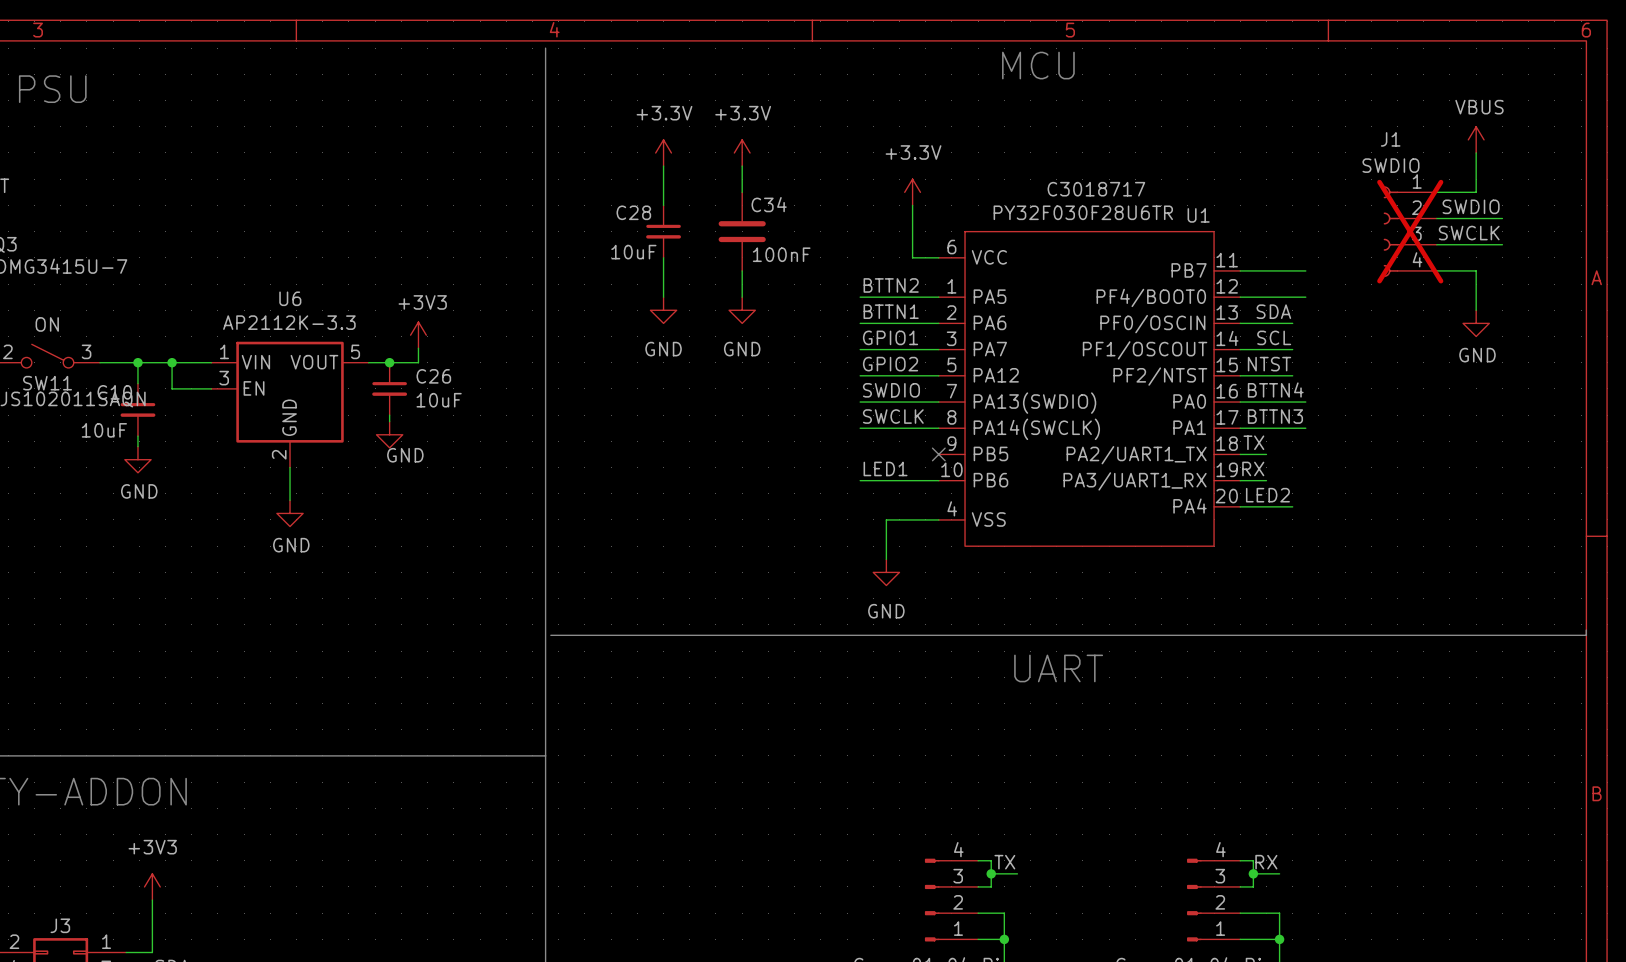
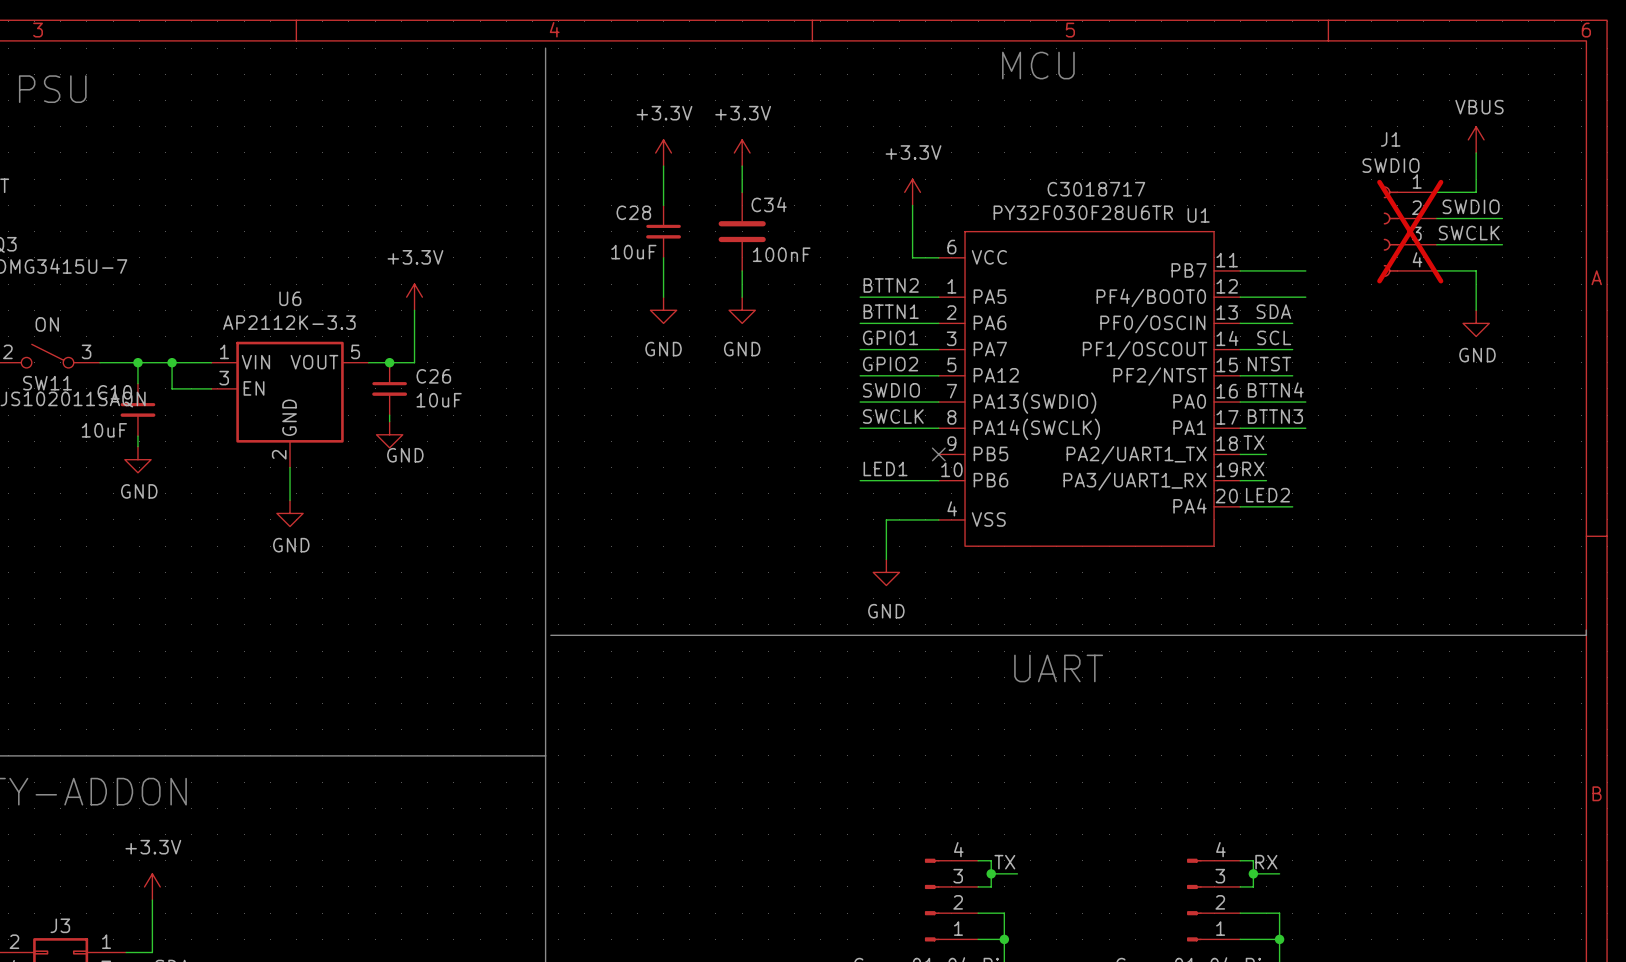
power symbol: none -> +3.3V (414, 297)
power symbol: +3V3 (418, 335) -> none
wire: (418, 348) (418, 362) (414, 362) -> (414, 310) (414, 362)
power symbol: +3V3 (152, 886) -> +3.3V (152, 886)

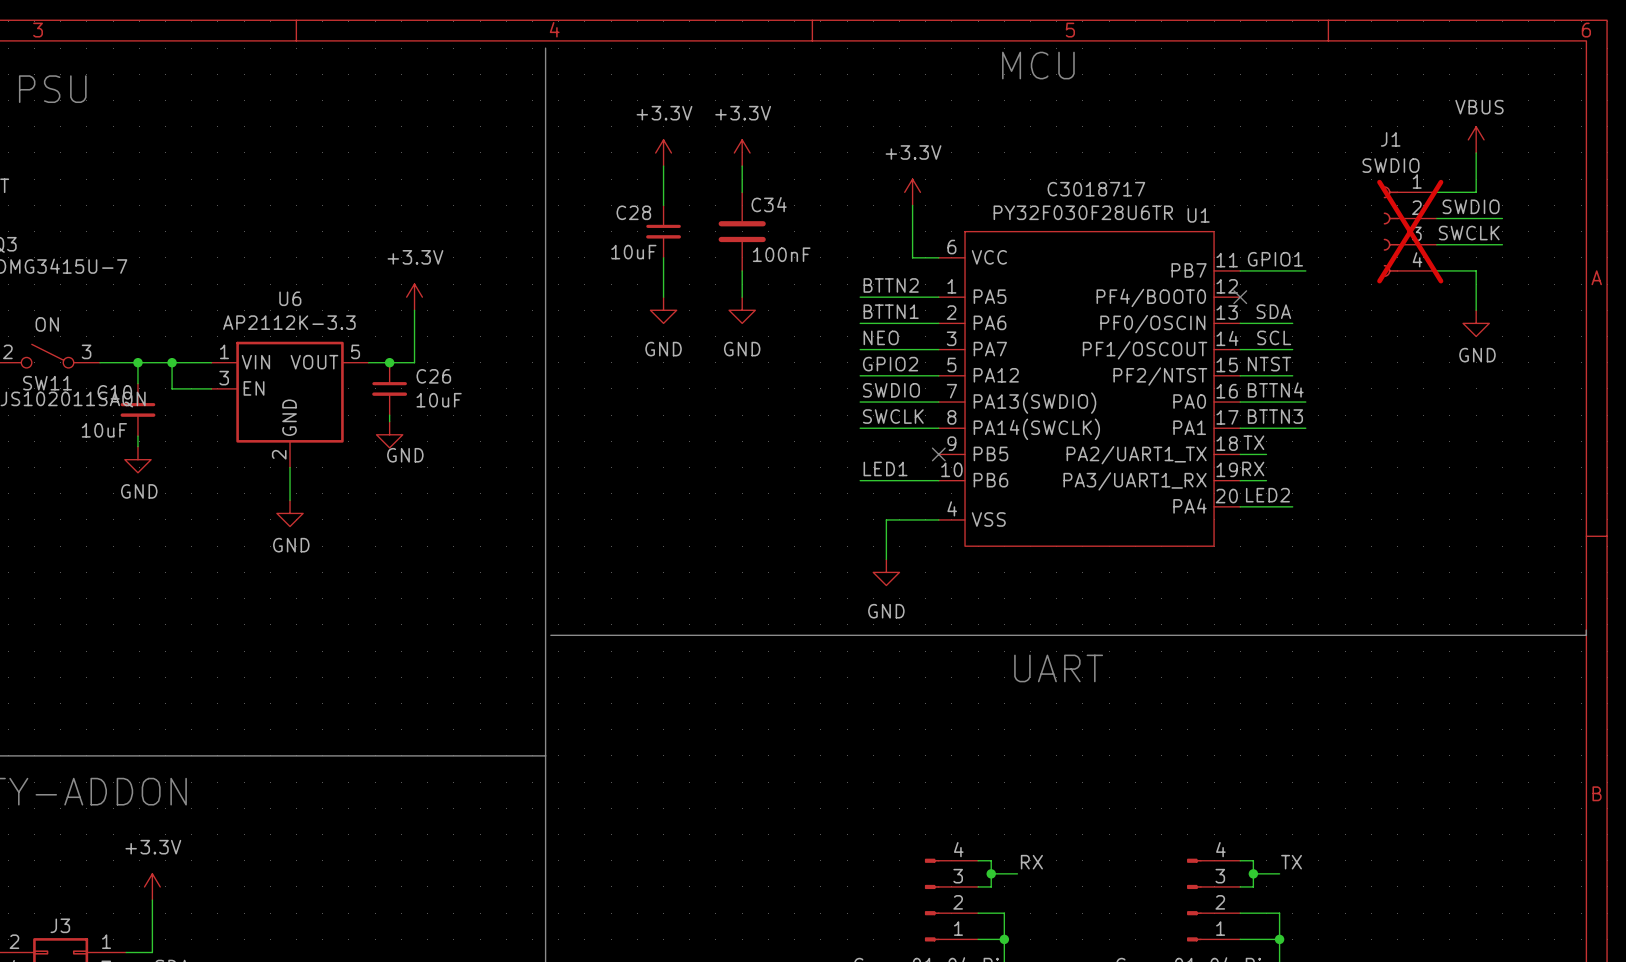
label: none -> GPIO1 (1275, 259)
wire: (1240, 297) (1305, 297) -> none
no-connect mark: none -> (1240, 297)
label: GPIO1 (890, 337) -> NEO (881, 337)
label: TX (1004, 862) -> RX (1031, 862)
label: RX (1266, 862) -> TX (1291, 862)

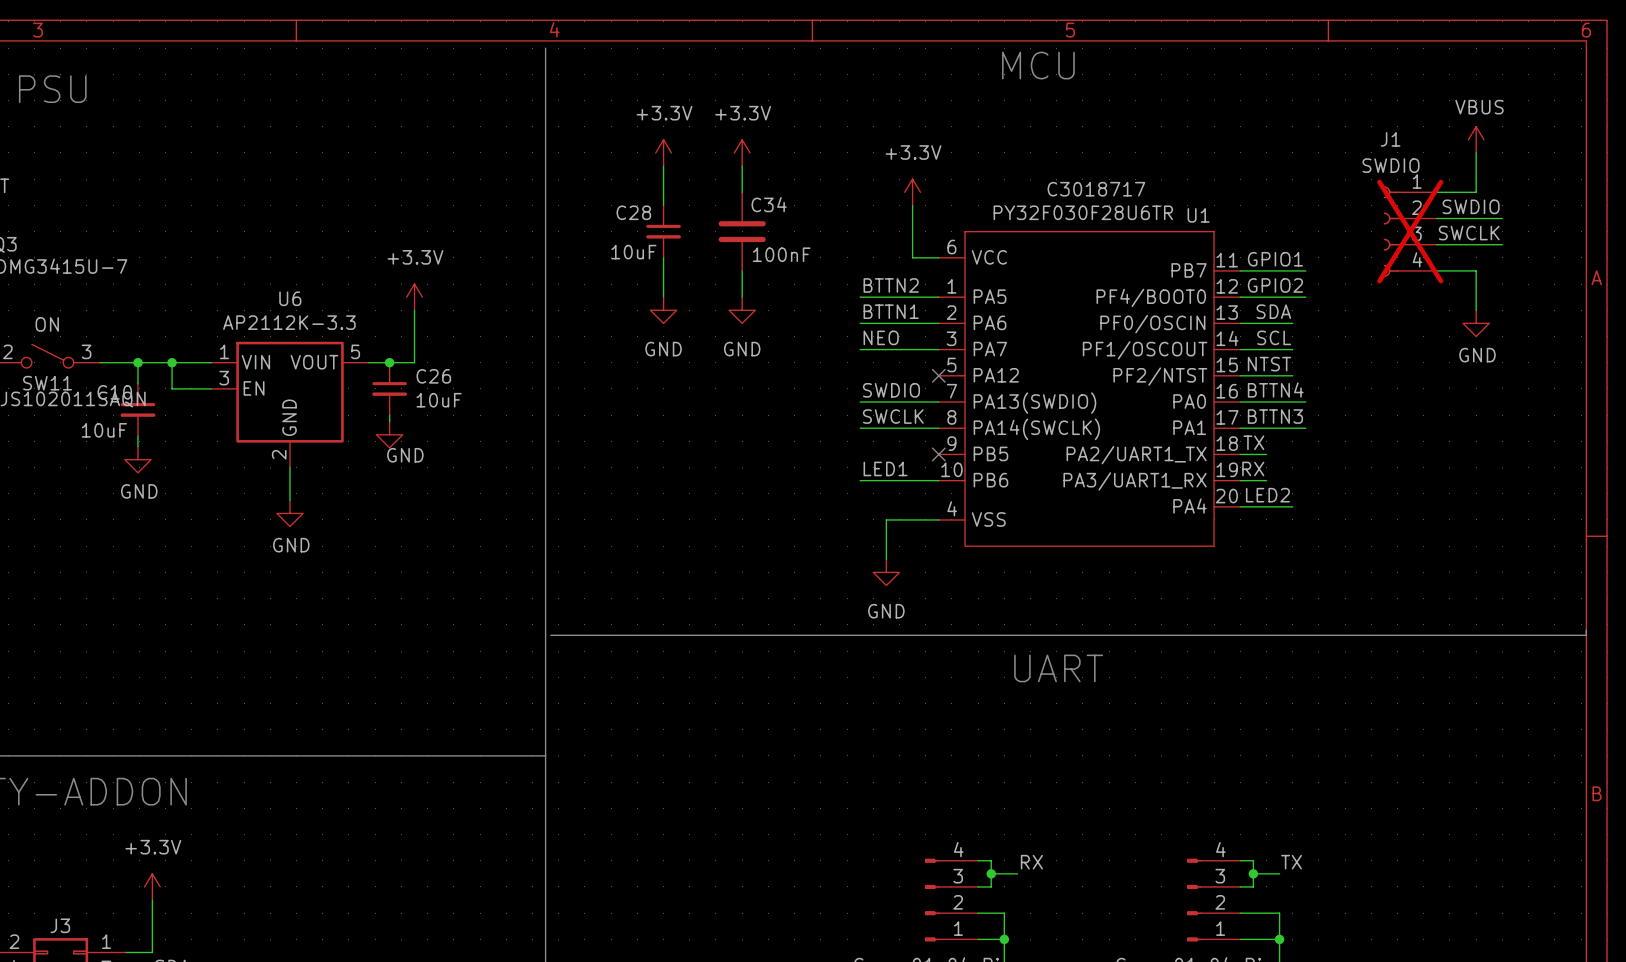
label: none -> GPIO2 (1275, 285)
wire: none -> (1240, 297) (1305, 297)
no-connect mark: (1240, 297) -> none
label: GPIO2 (890, 364) -> none
wire: (860, 375) (938, 375) -> none
no-connect mark: none -> (938, 375)

